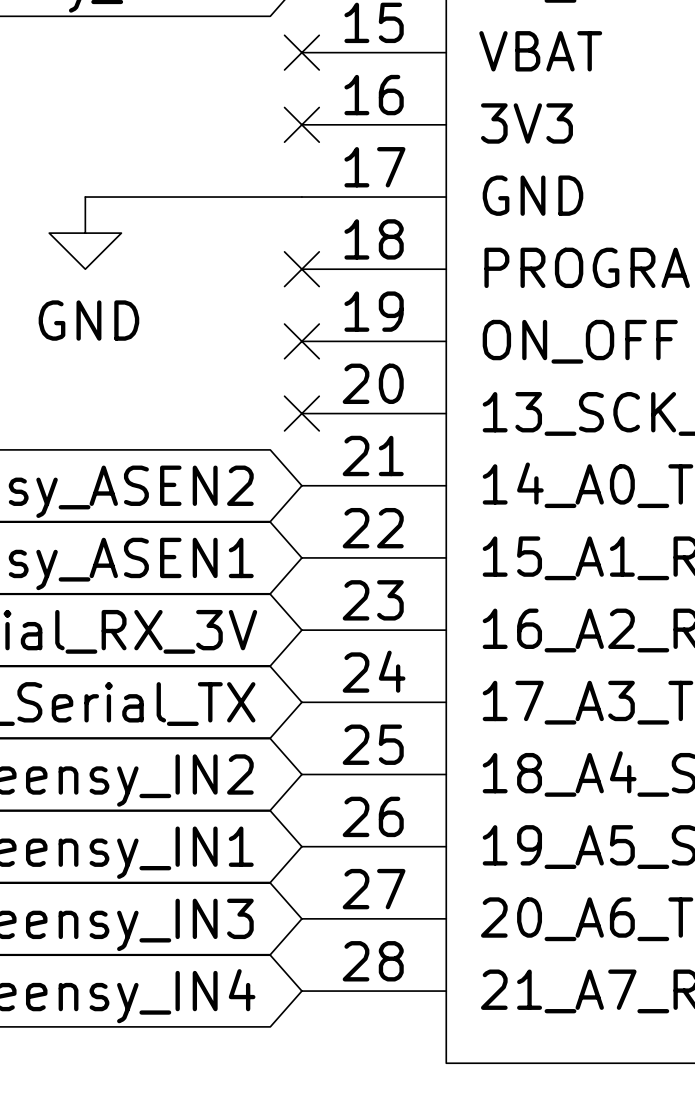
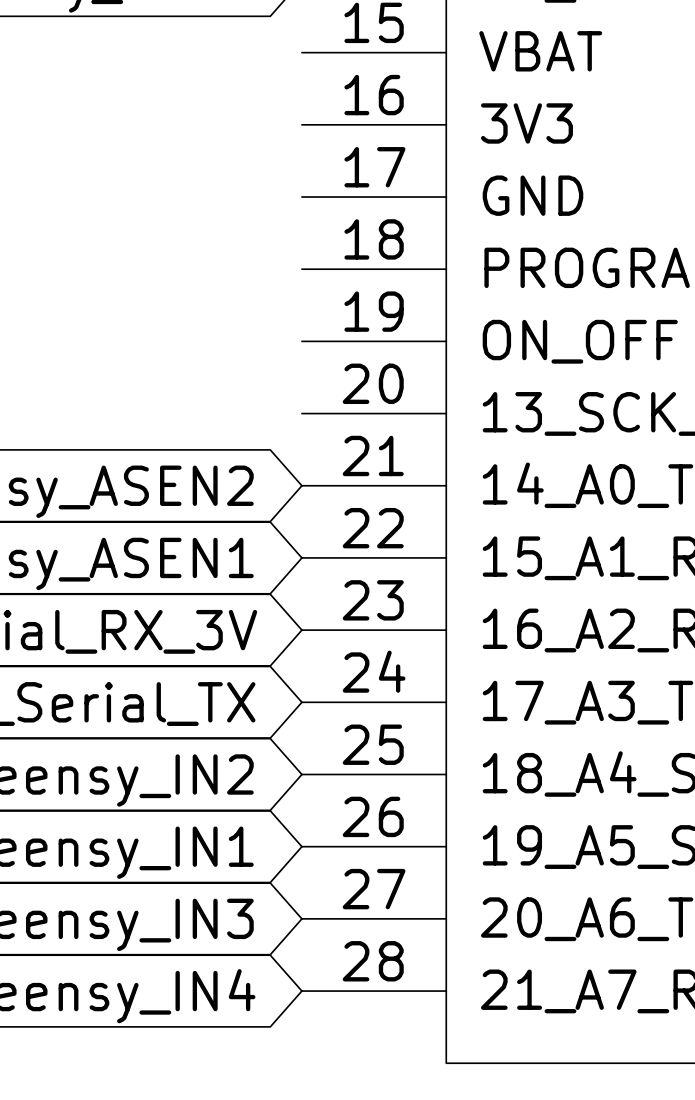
no-connect mark: (301, 52) -> none
no-connect mark: (301, 124) -> none
wire: (85, 197) (301, 197) -> none
power symbol: GND (85, 233) -> none
no-connect mark: (301, 269) -> none
no-connect mark: (301, 341) -> none
no-connect mark: (301, 413) -> none

